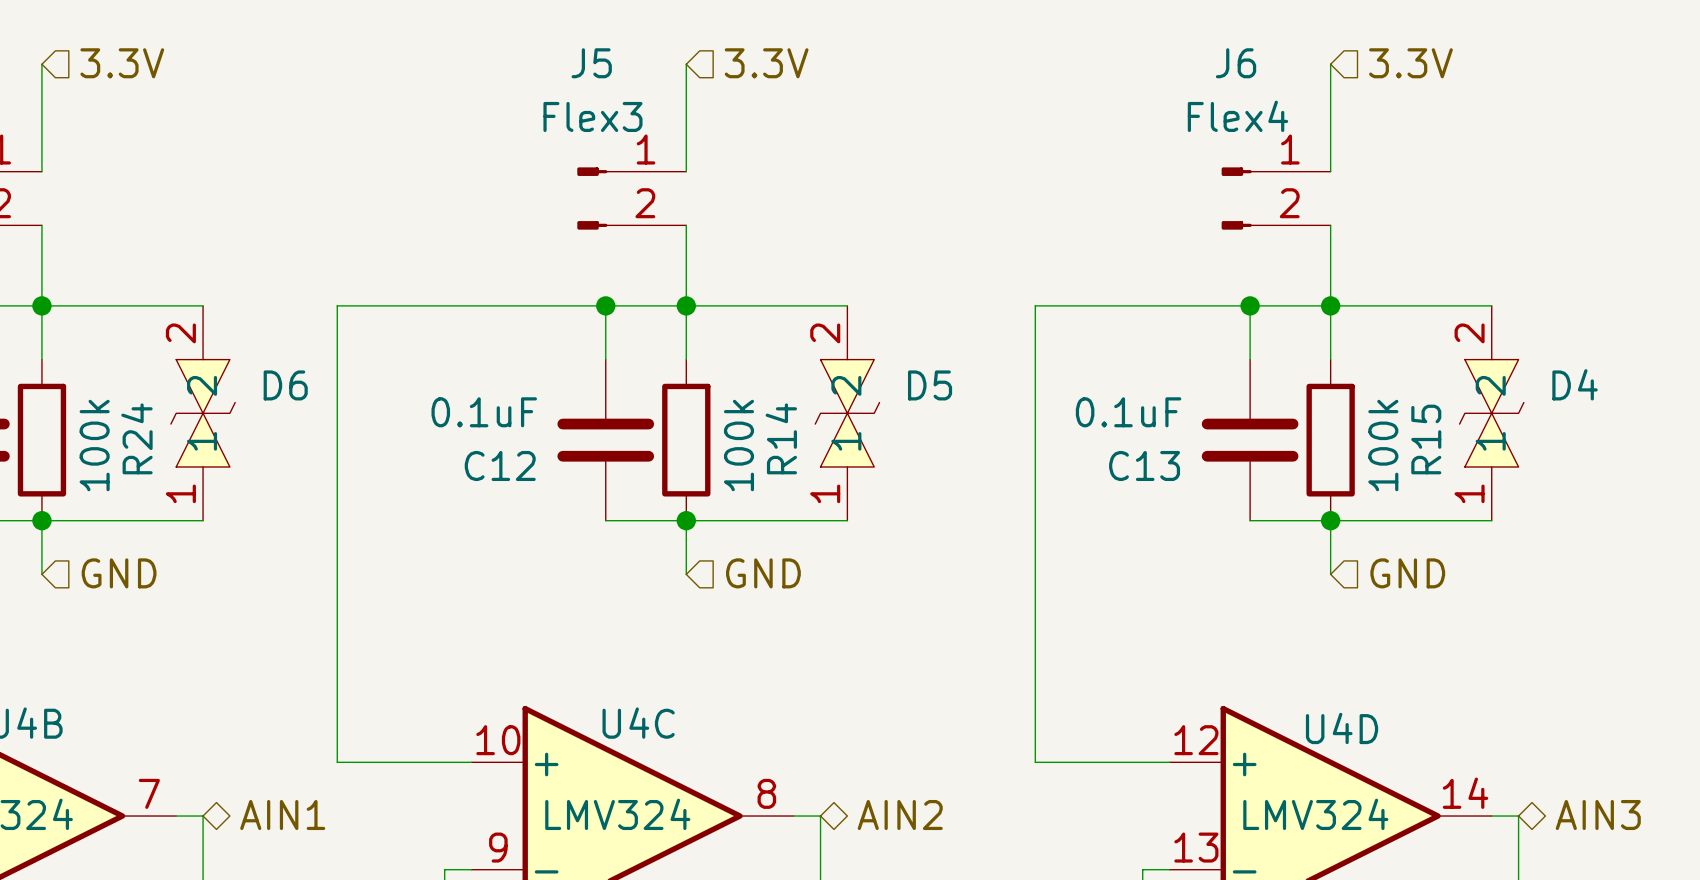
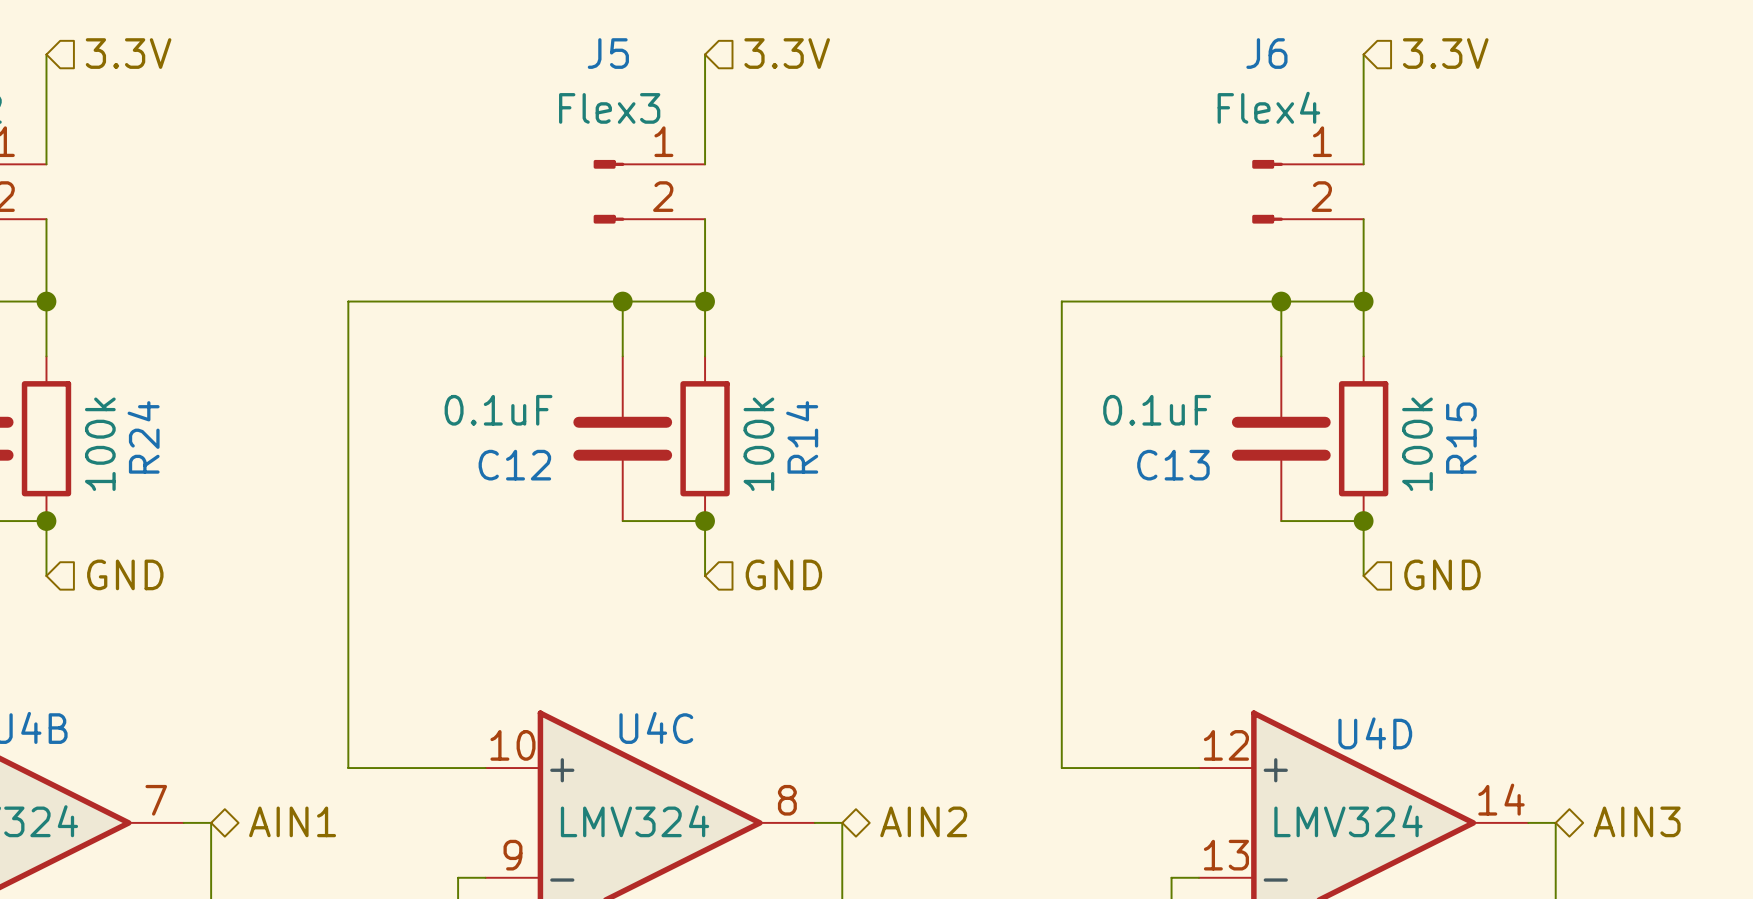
wire: (41, 305) (203, 305) -> none
wire: (686, 305) (847, 305) -> none
wire: (1330, 305) (1491, 305) -> none
D6: (203, 413) -> none
D5: (847, 413) -> none
D4: (1491, 413) -> none
wire: (41, 520) (203, 520) -> none
wire: (686, 520) (847, 520) -> none
wire: (1330, 520) (1491, 520) -> none

